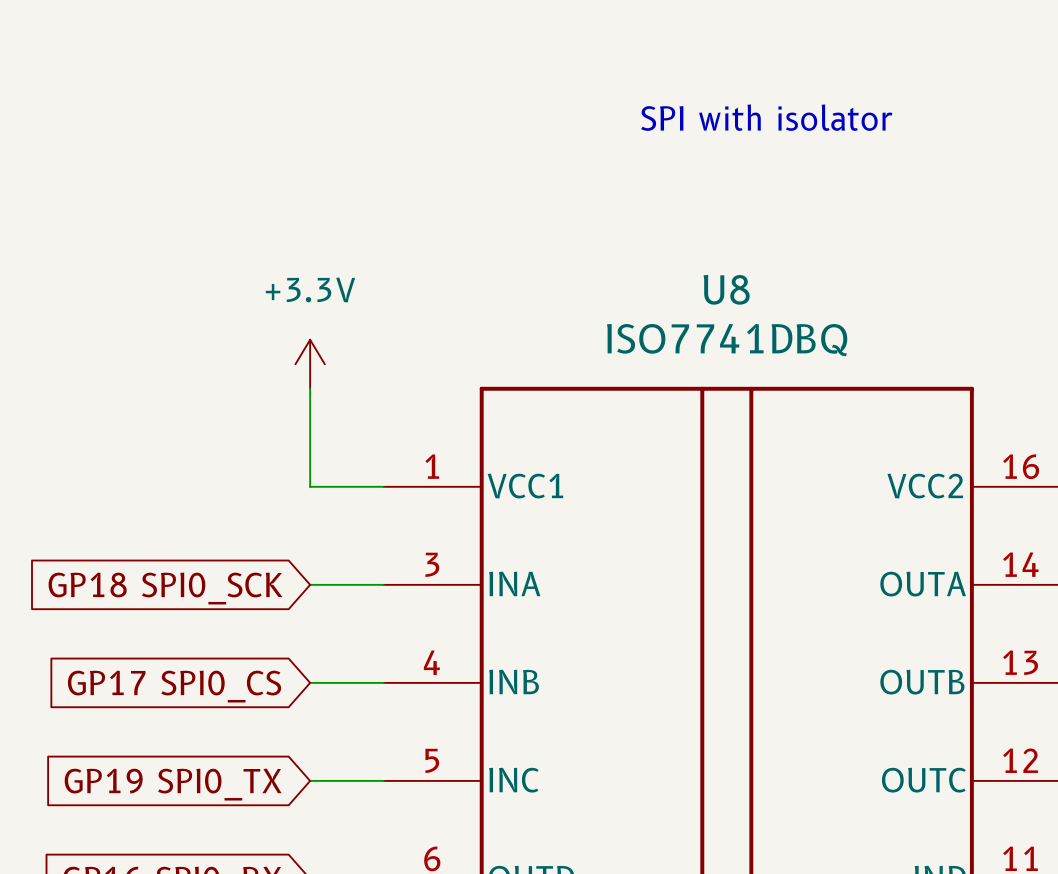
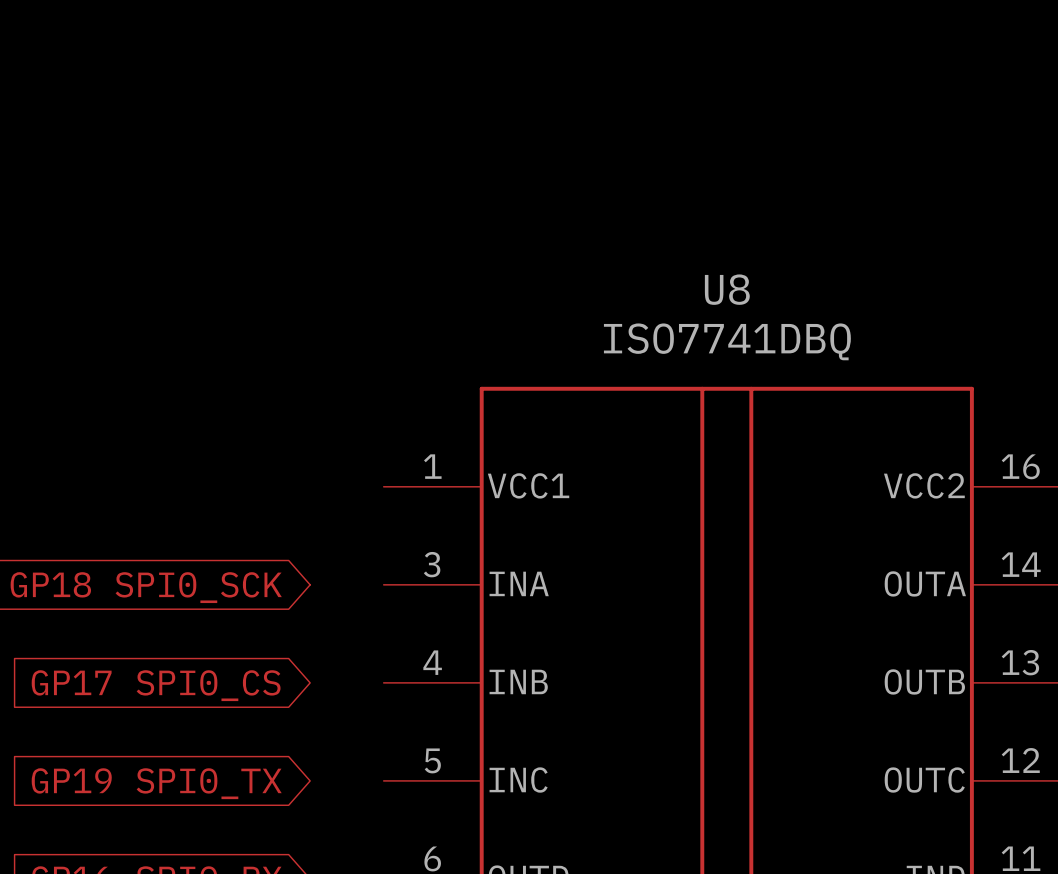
text: SPI with isolator (766, 117) -> none
power symbol: +3.3V (310, 364) -> none
wire: (310, 388) (310, 486) (383, 486) -> none
wire: (310, 584) (383, 584) -> none
wire: (310, 682) (383, 682) -> none
wire: (310, 780) (383, 780) -> none

